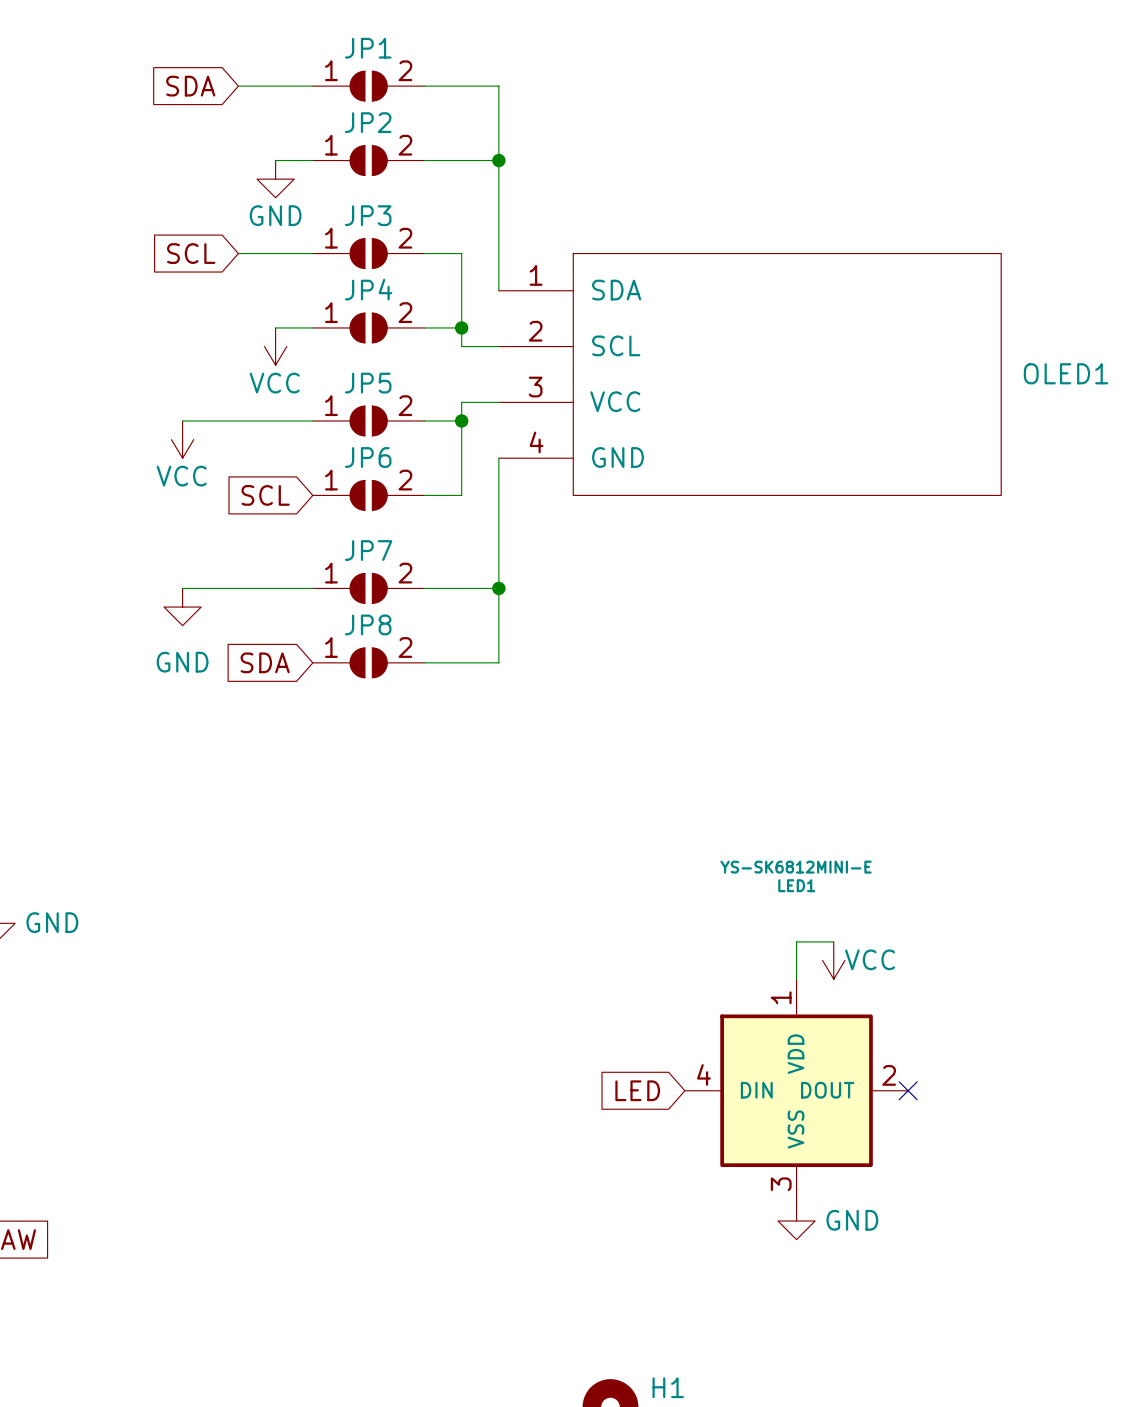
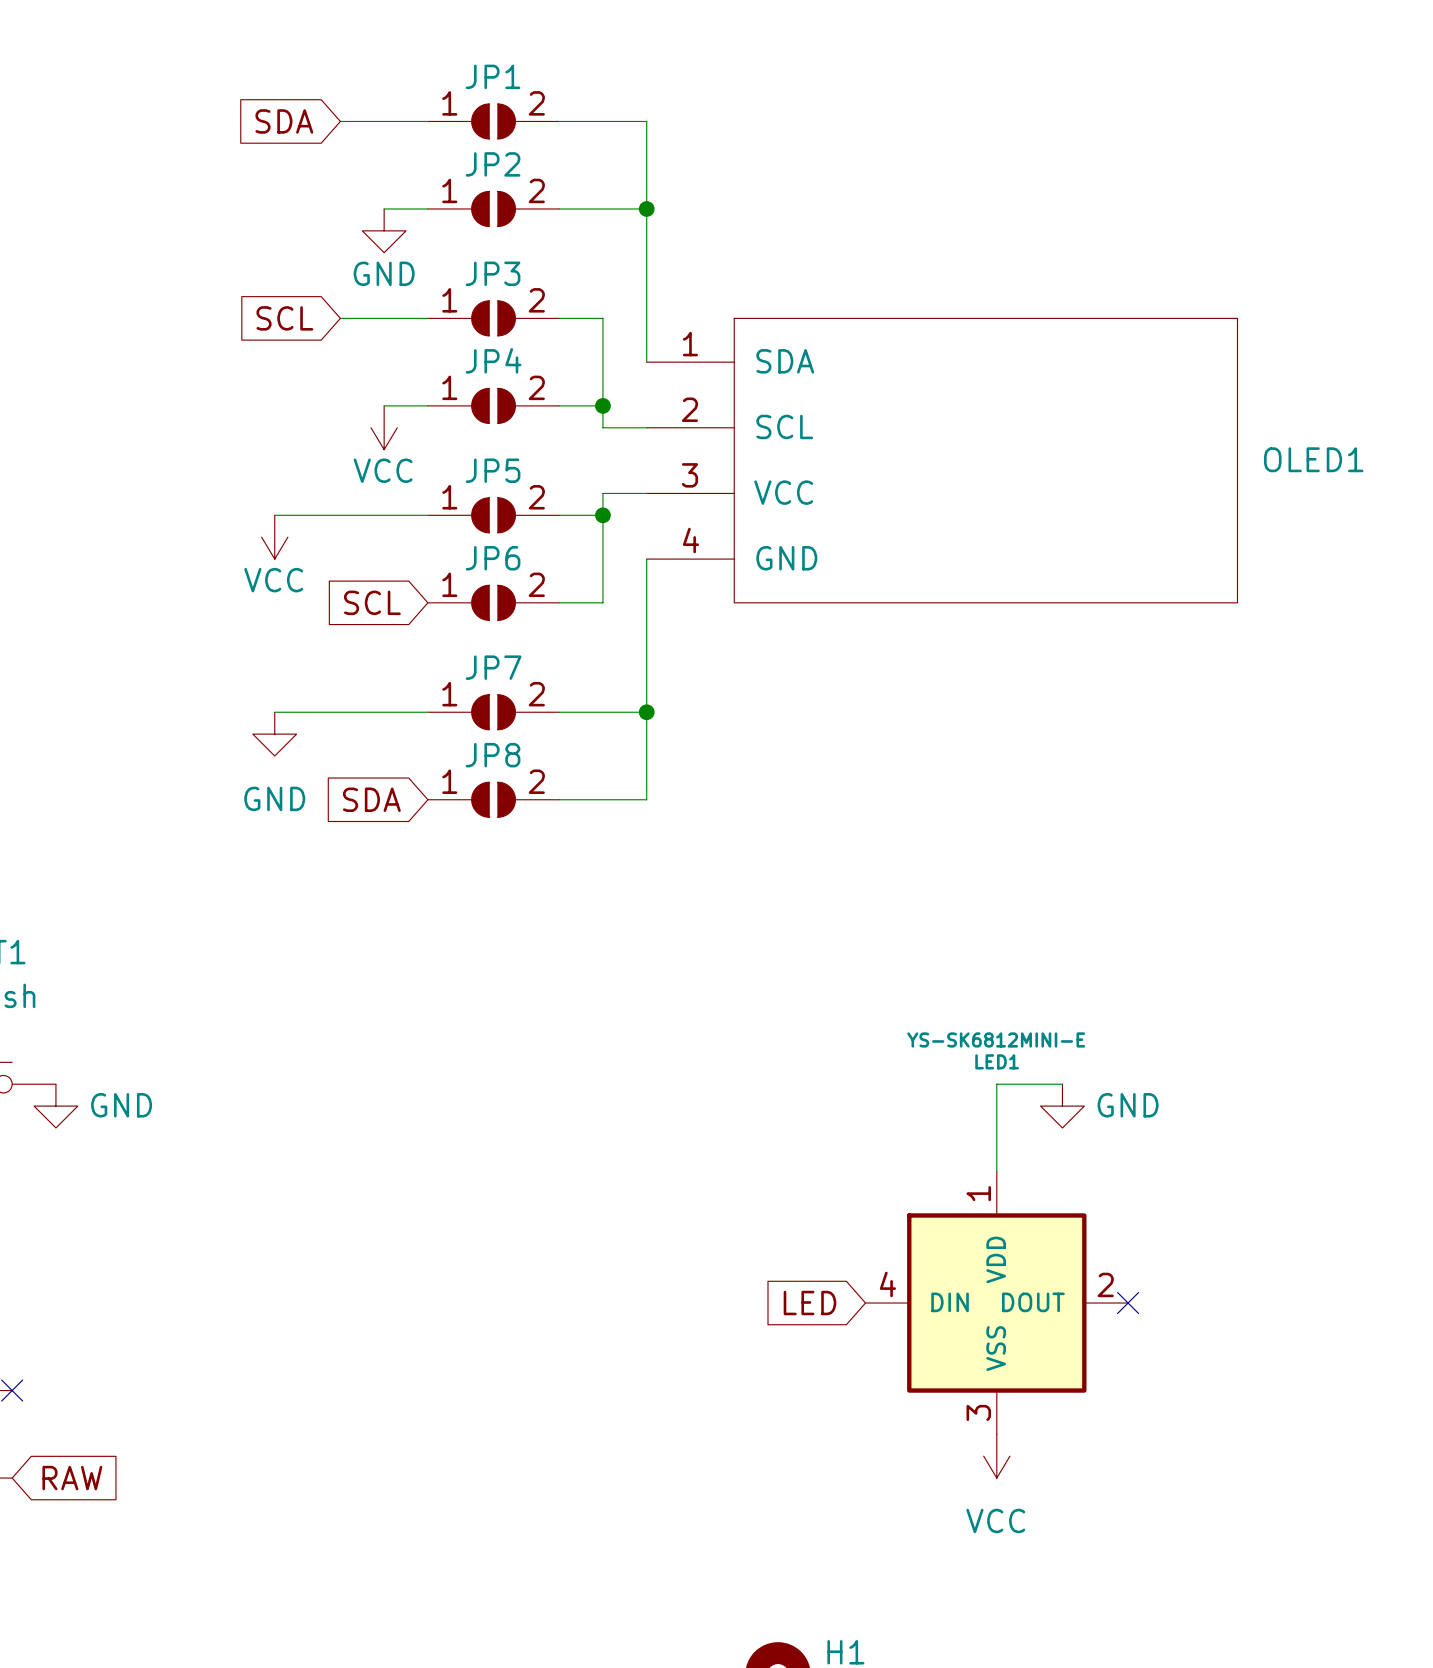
power symbol: none -> GND (1062, 1106)
wire: (796, 941) (833, 941) -> (996, 1127) (996, 1084) (1062, 1084)
power symbol: VCC (833, 960) -> none
power symbol: GND (796, 1220) -> VCC (996, 1456)

